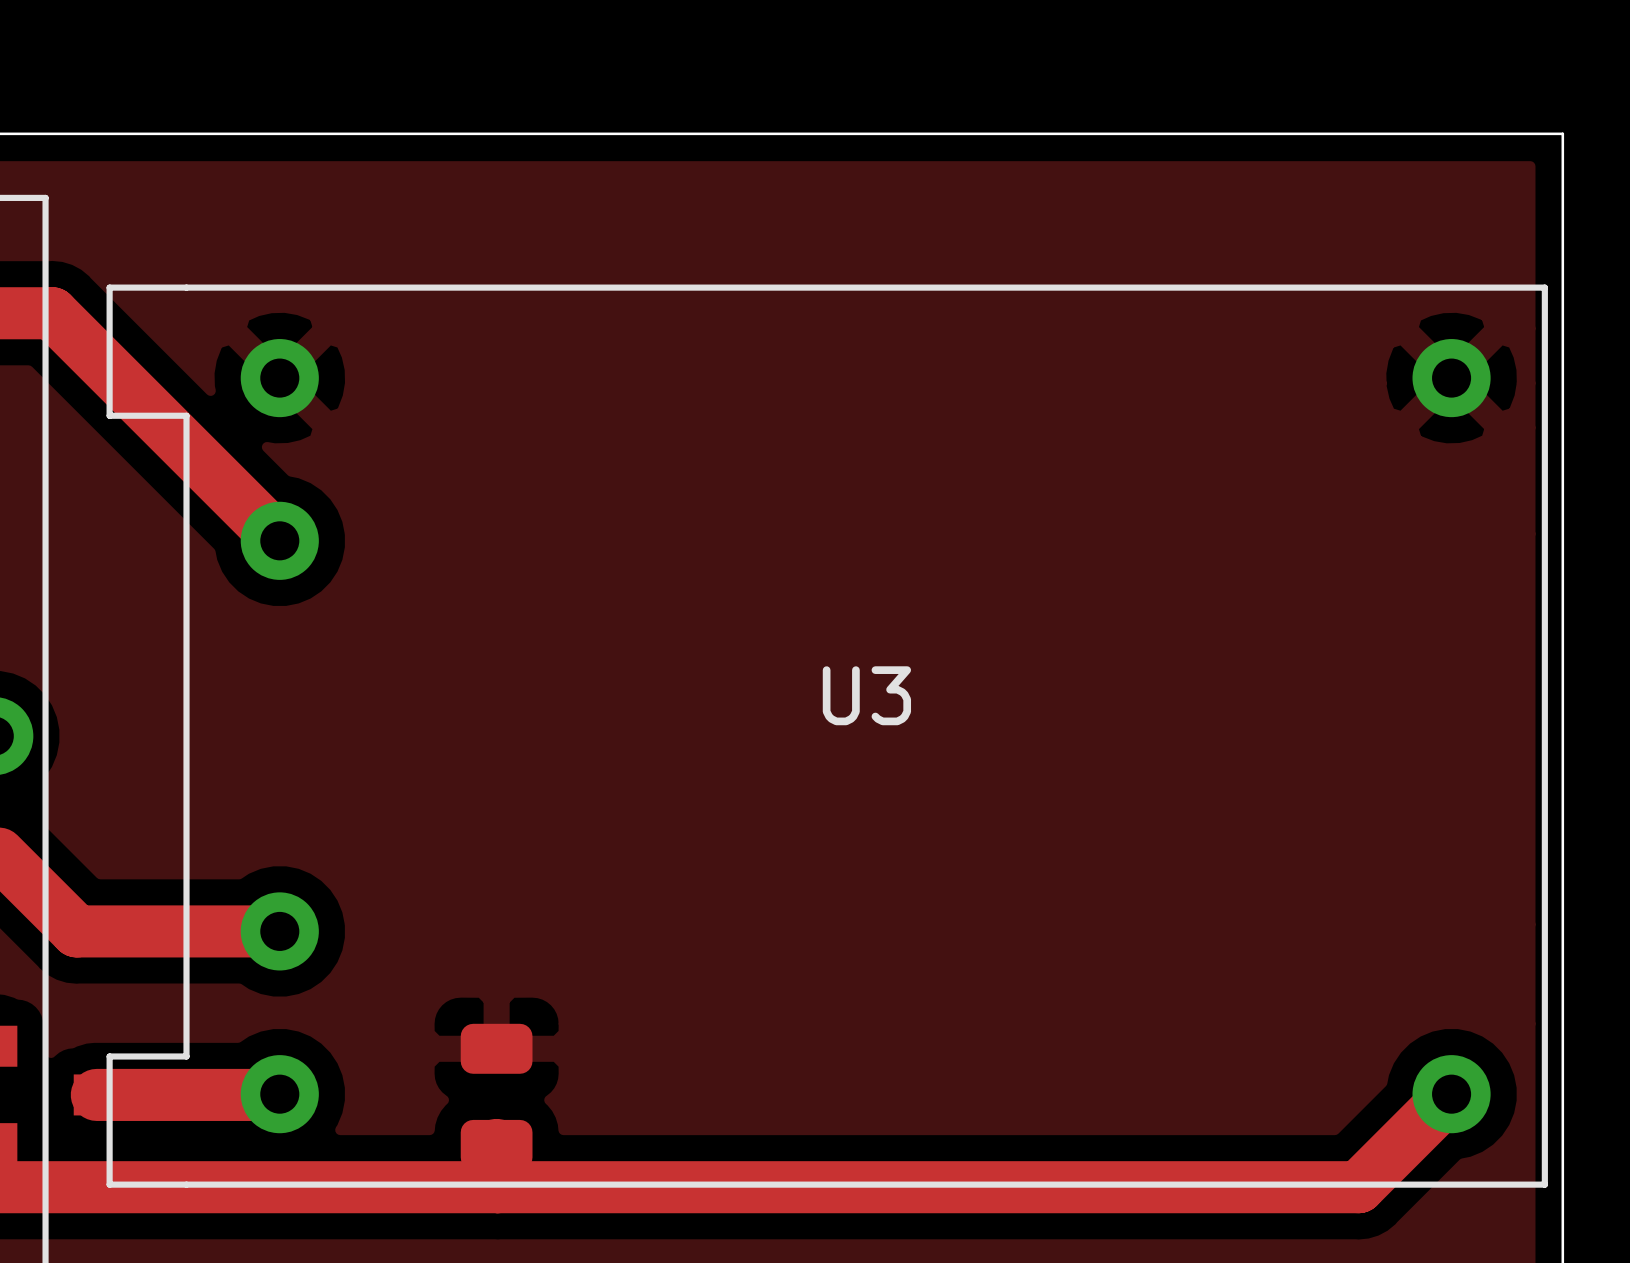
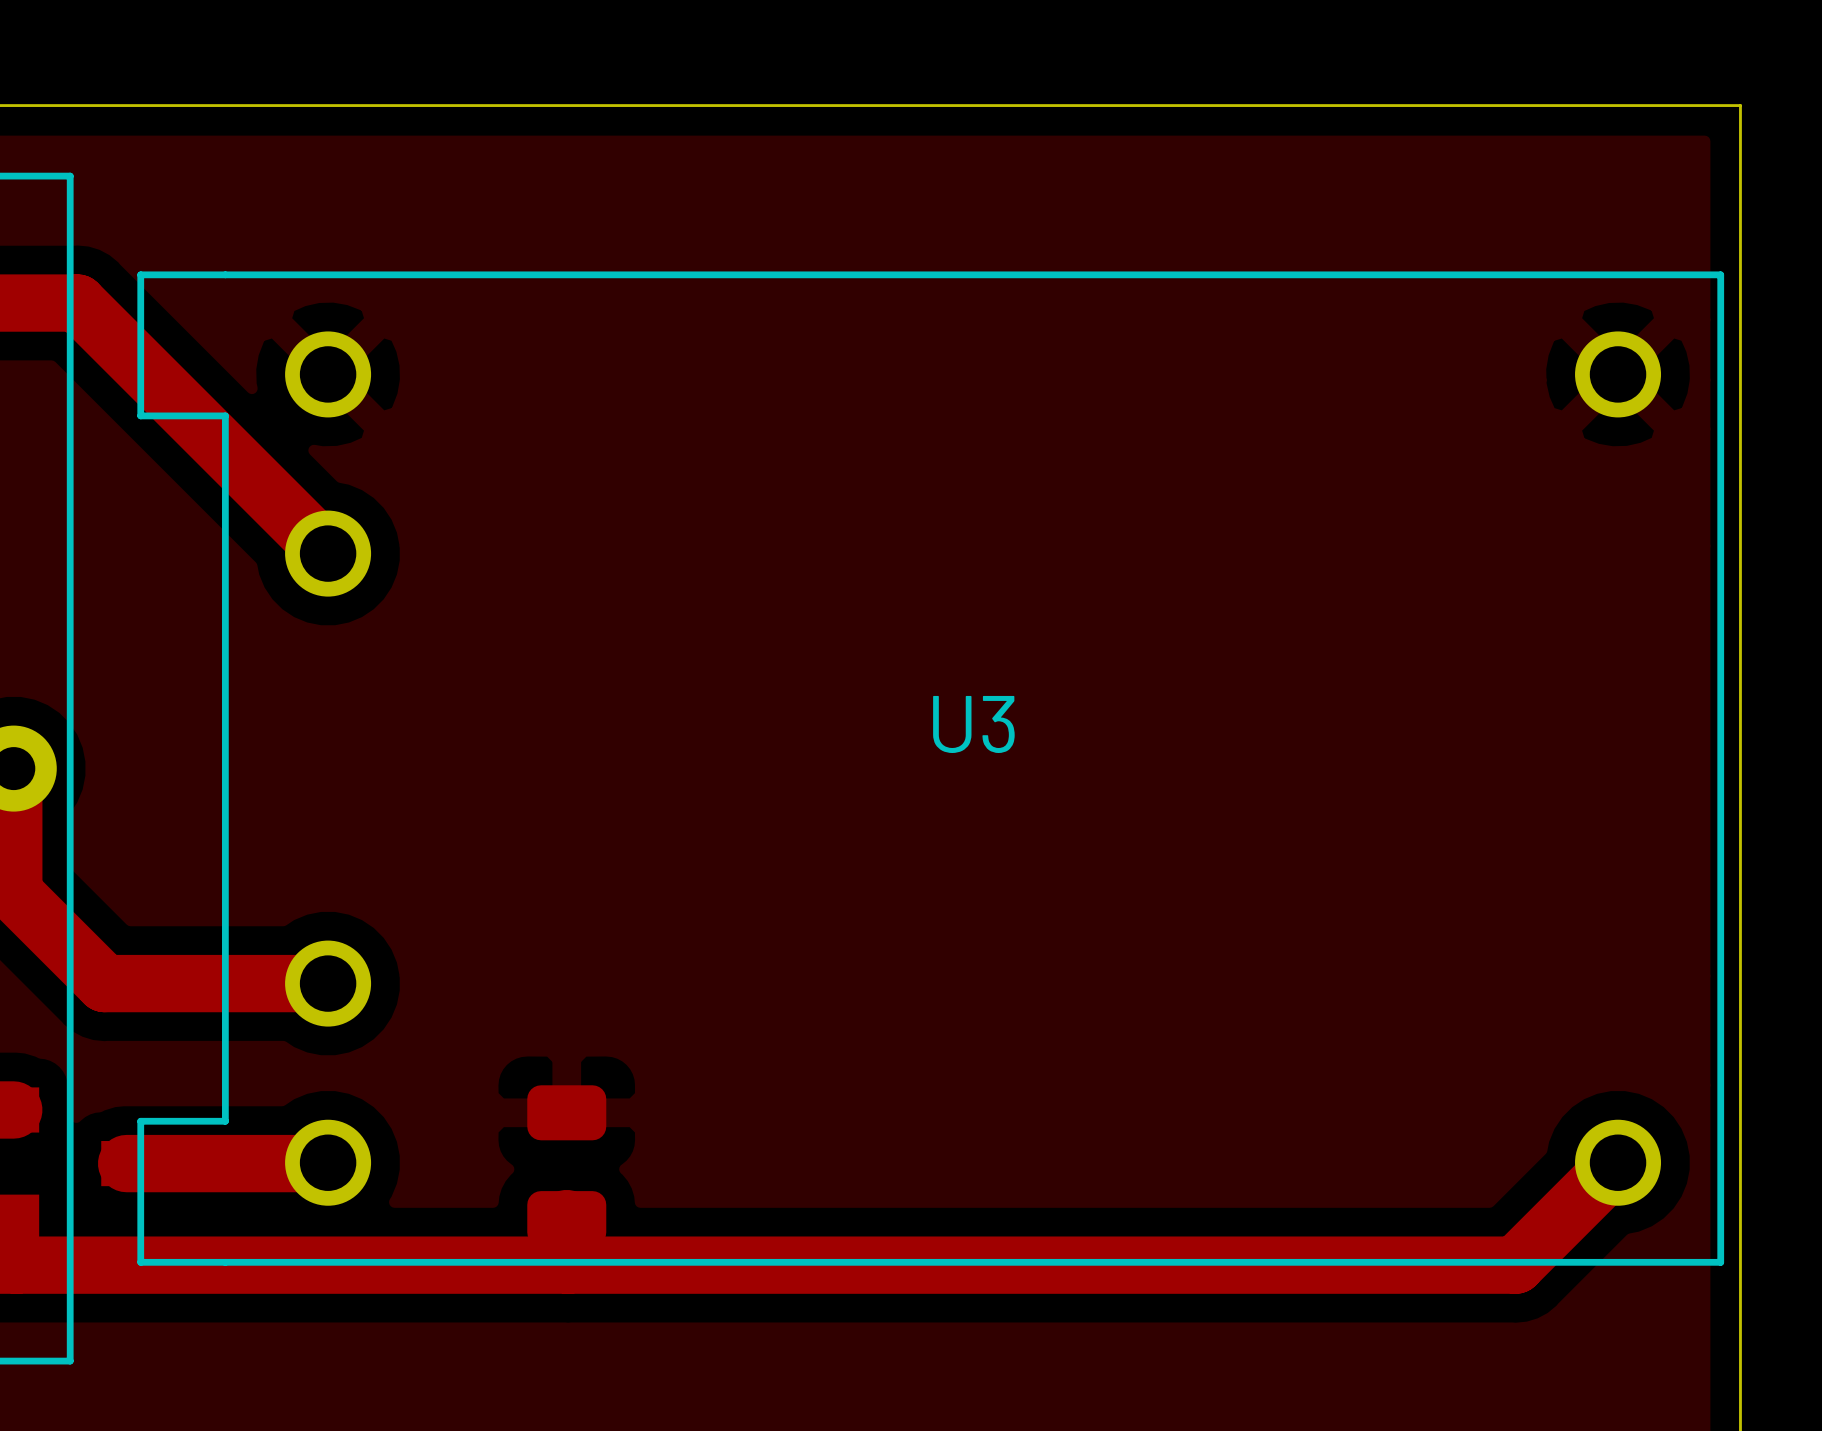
U3 footprint: [106, 284, 1548, 1188] -> [137, 271, 1725, 1266]

